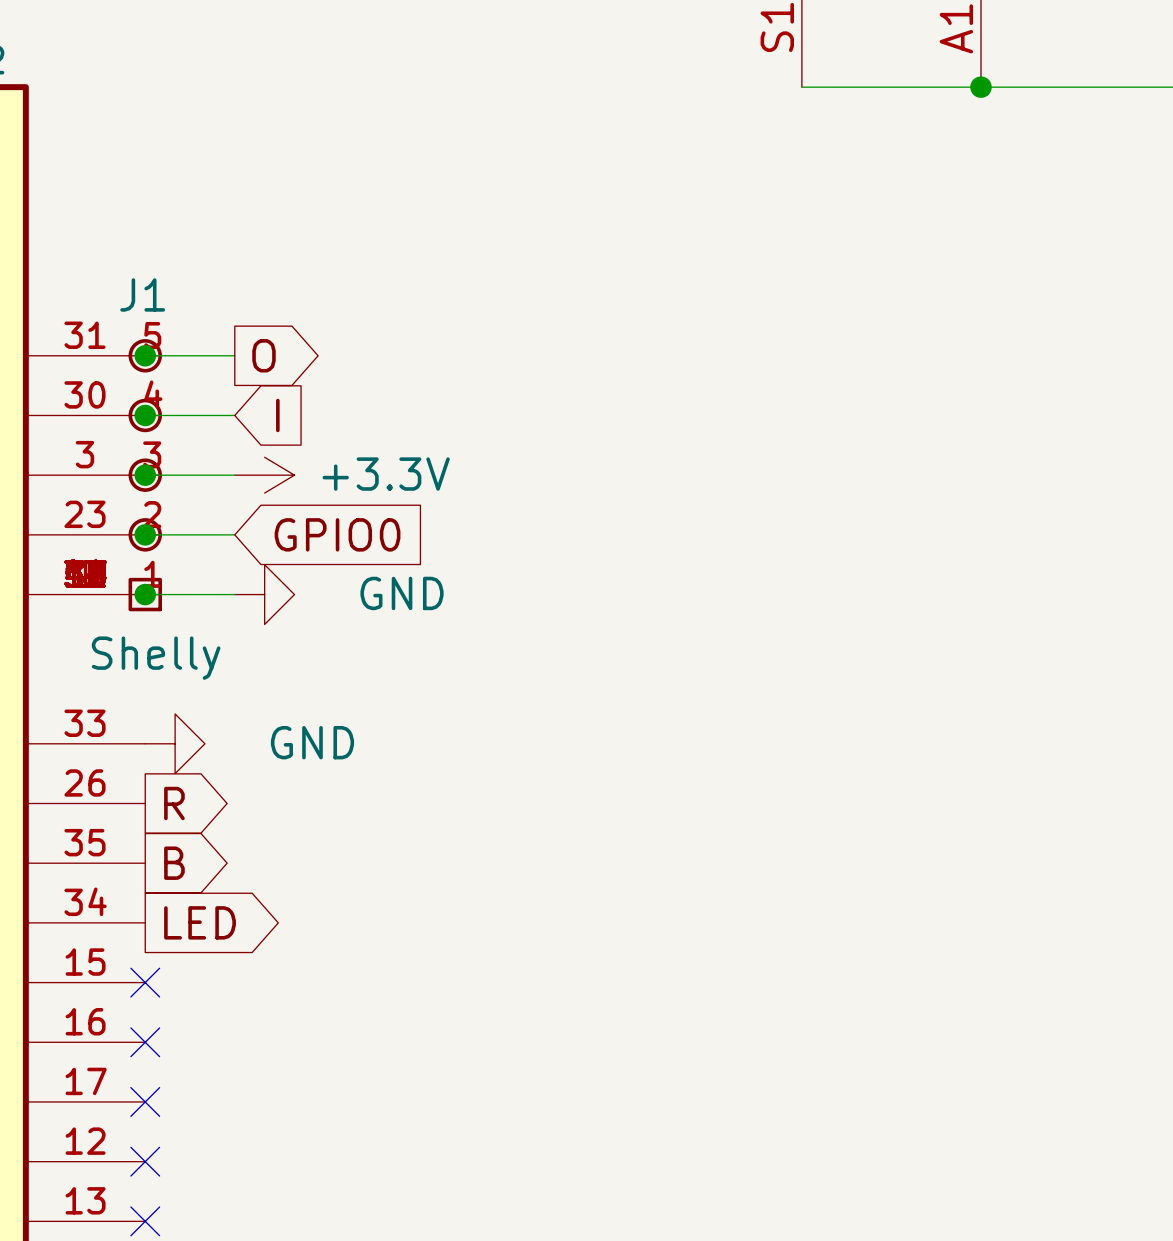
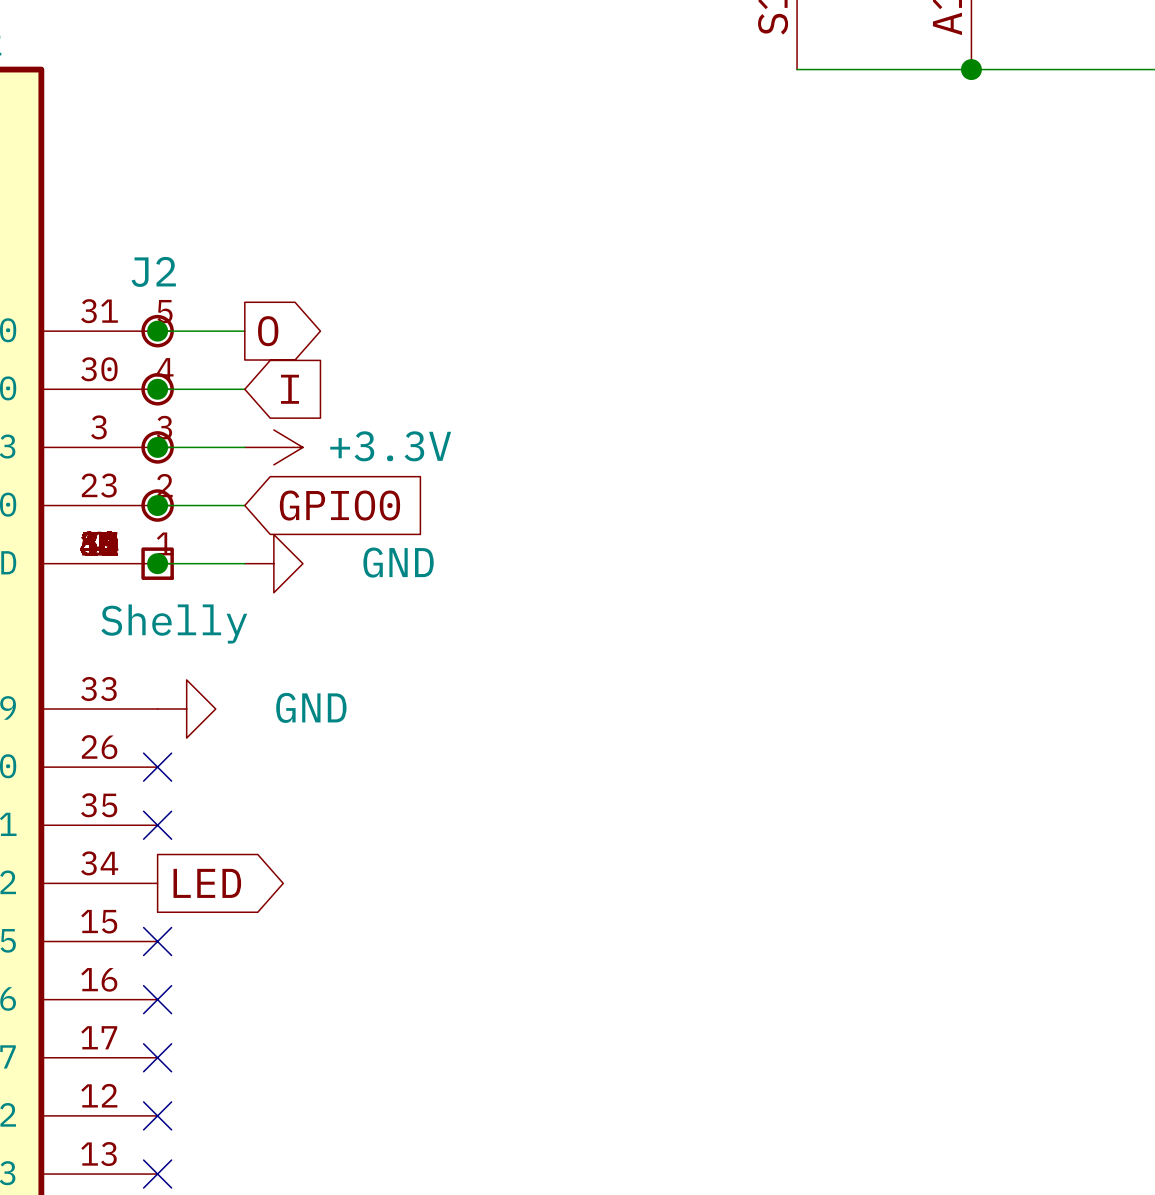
J1 name: J1 (142, 294) -> J2 (153, 271)
no-connect mark: none -> (157, 767)
global label: R (174, 803) -> none
no-connect mark: none -> (157, 825)
global label: B (174, 863) -> none

